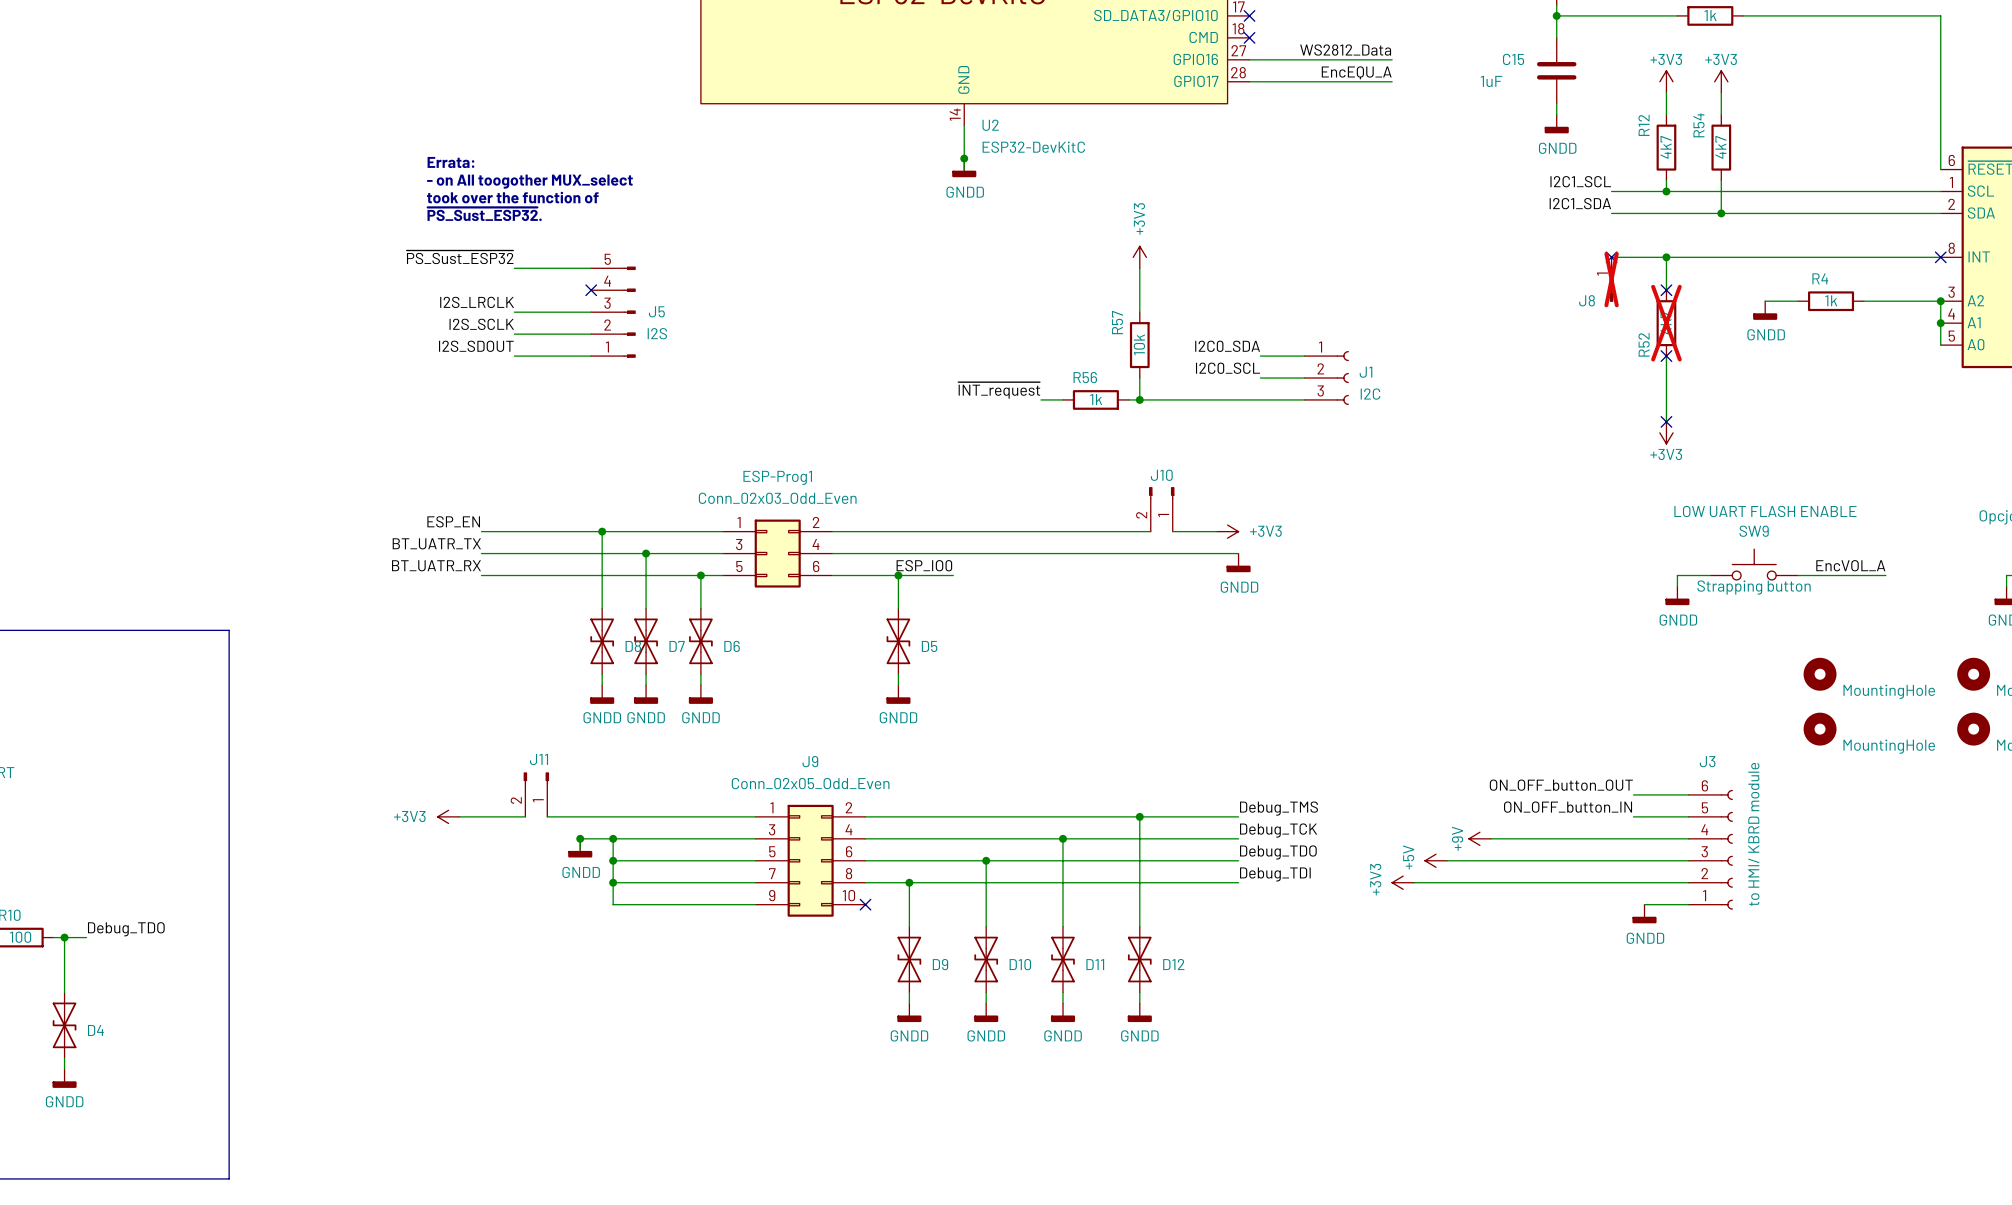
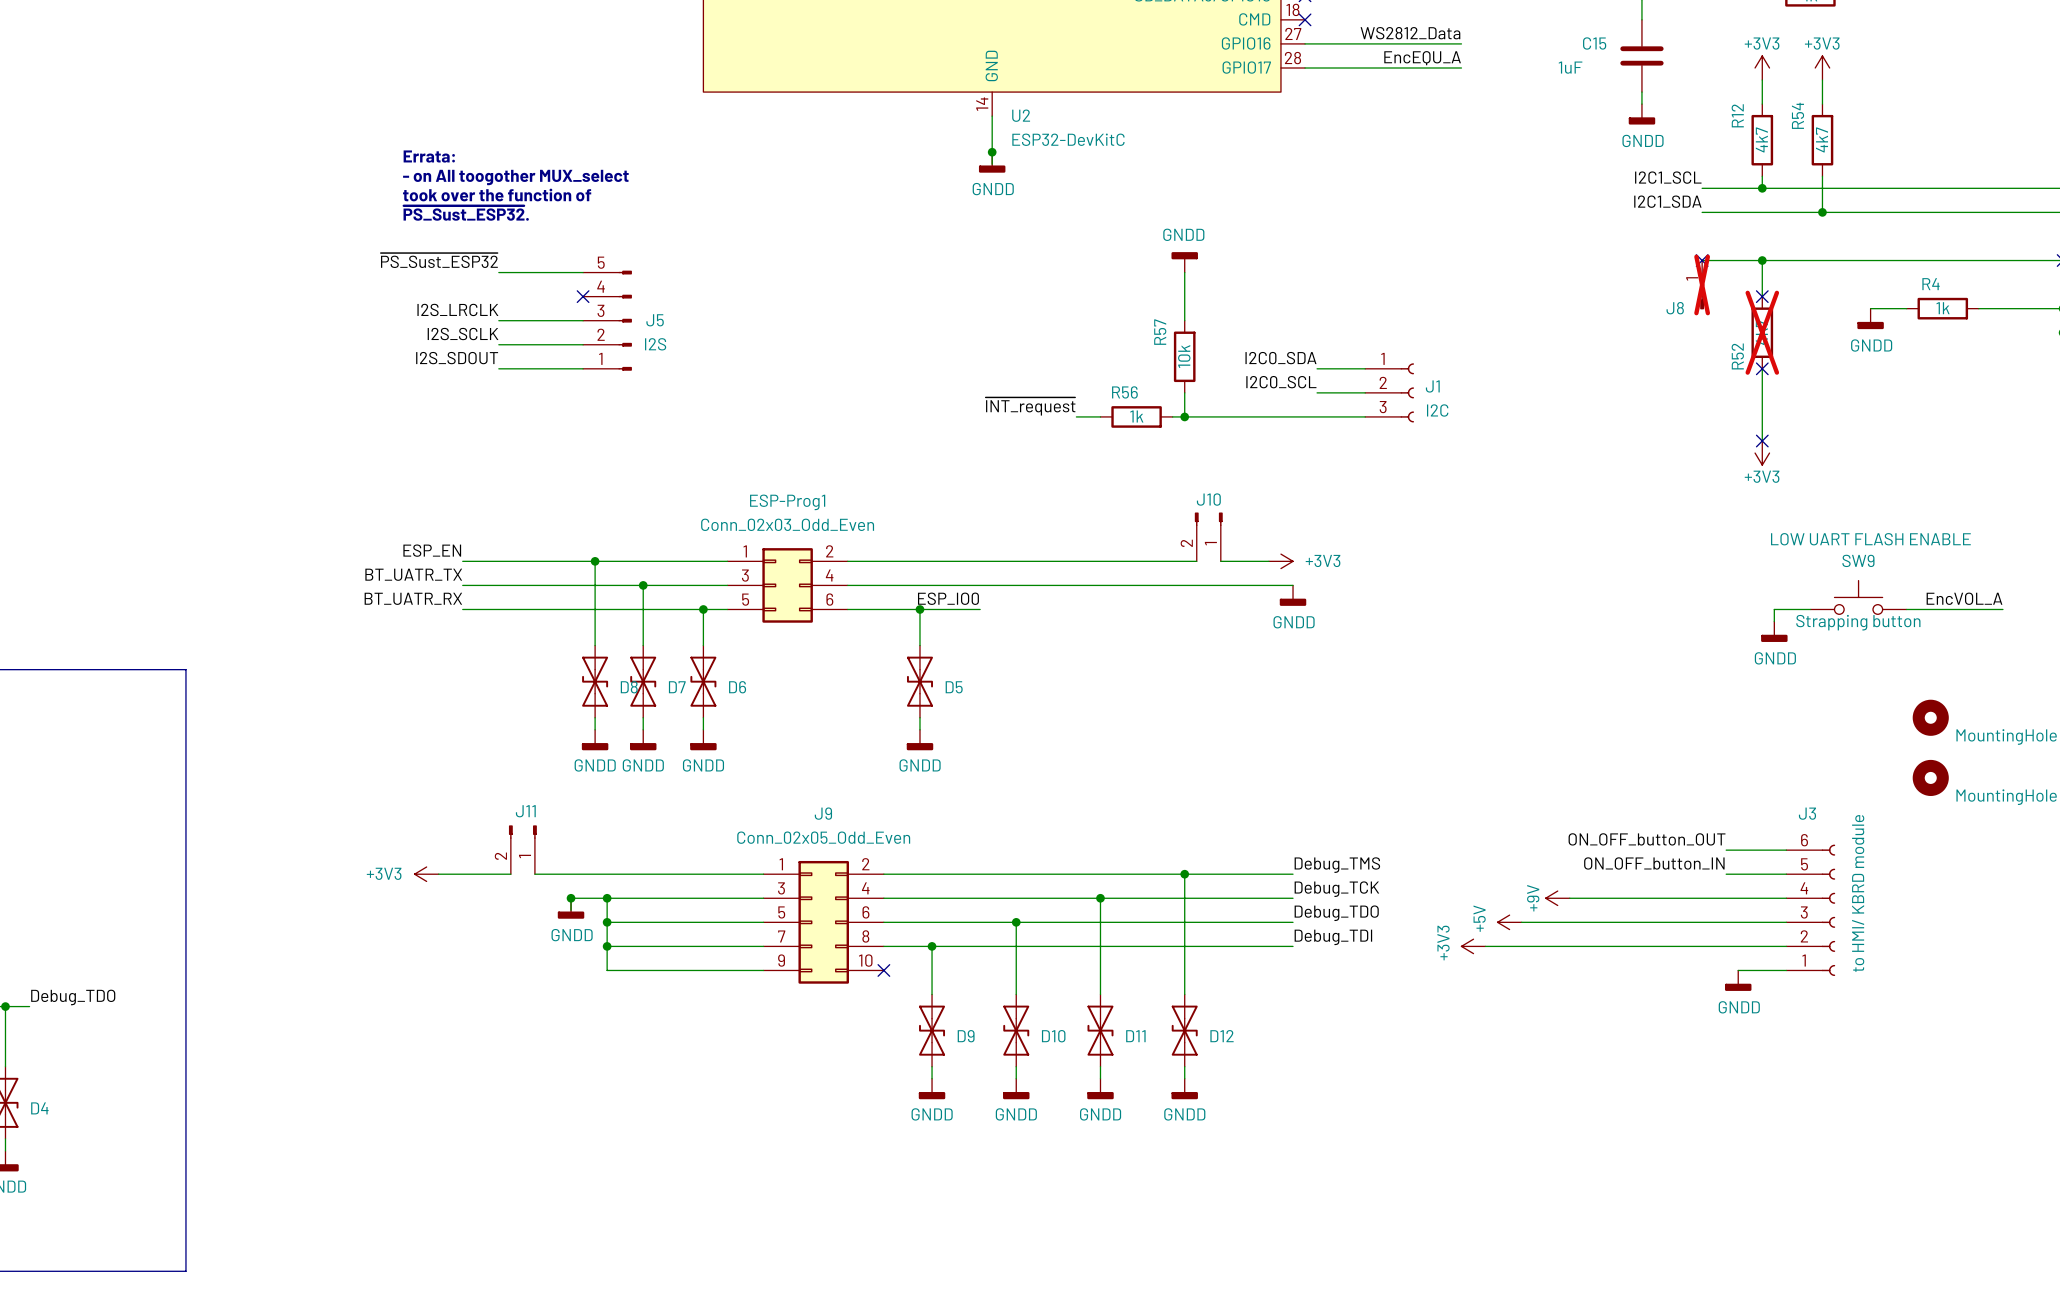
power symbol: +3V3 (1139, 257) -> GNDD (1184, 262)

